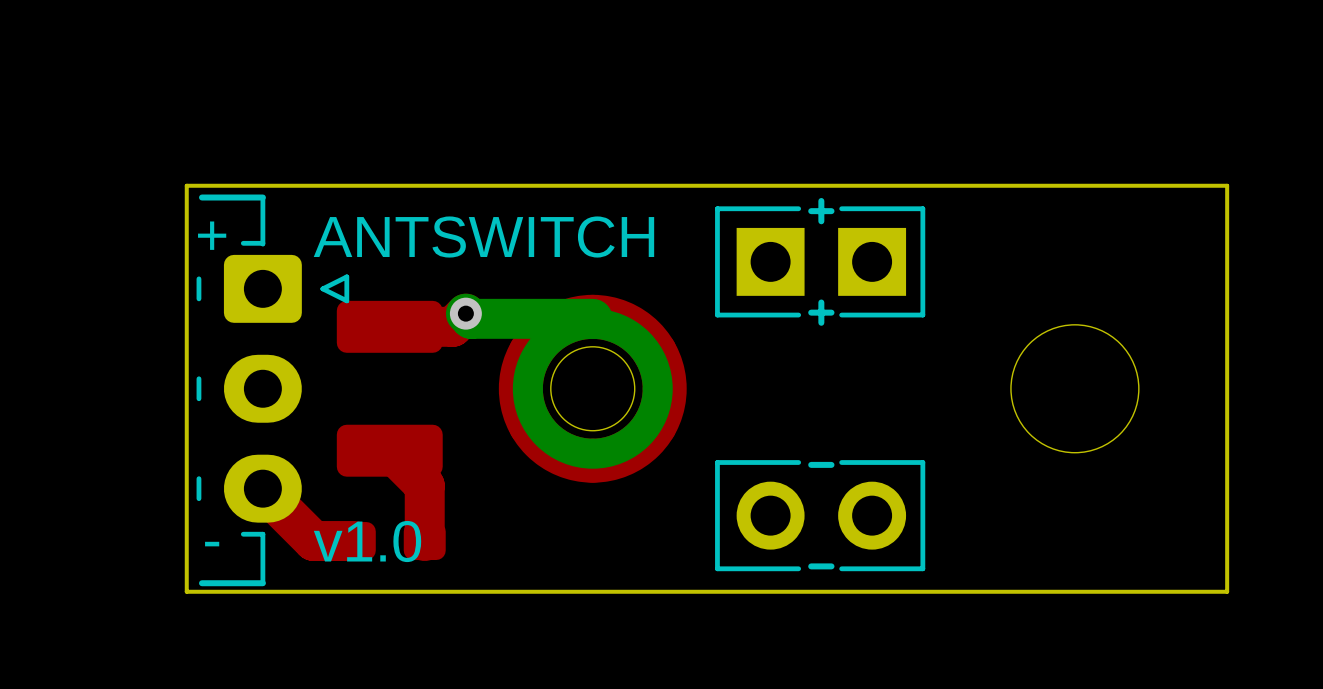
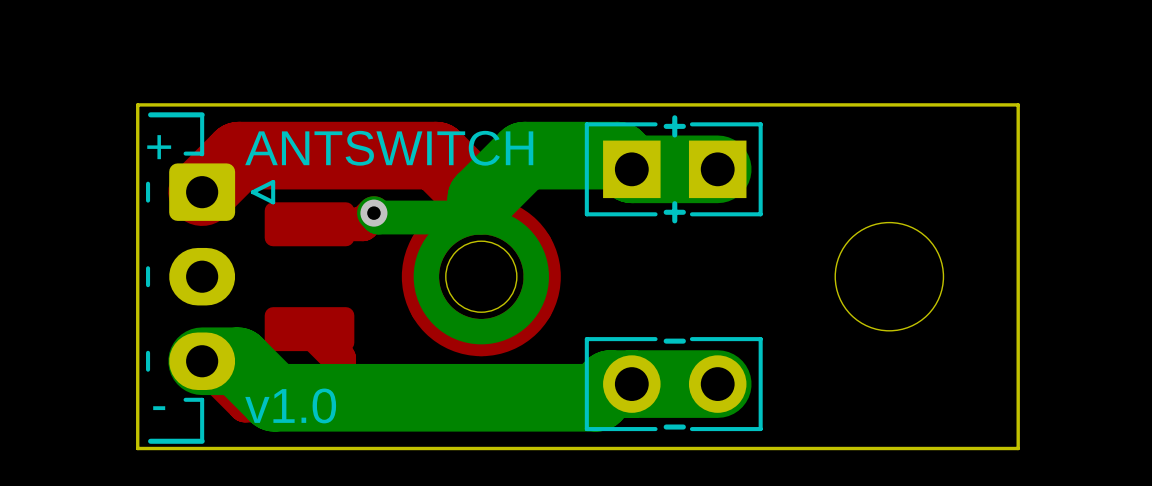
bottom track: none -> (717, 169) (631, 169) (618, 155) (524, 155) (481, 200)
top track: none -> (202, 192) (238, 155) (436, 155) (481, 200)
bottom track: none -> (202, 361) (237, 361) (274, 397) (596, 397) (610, 384) (717, 384)

